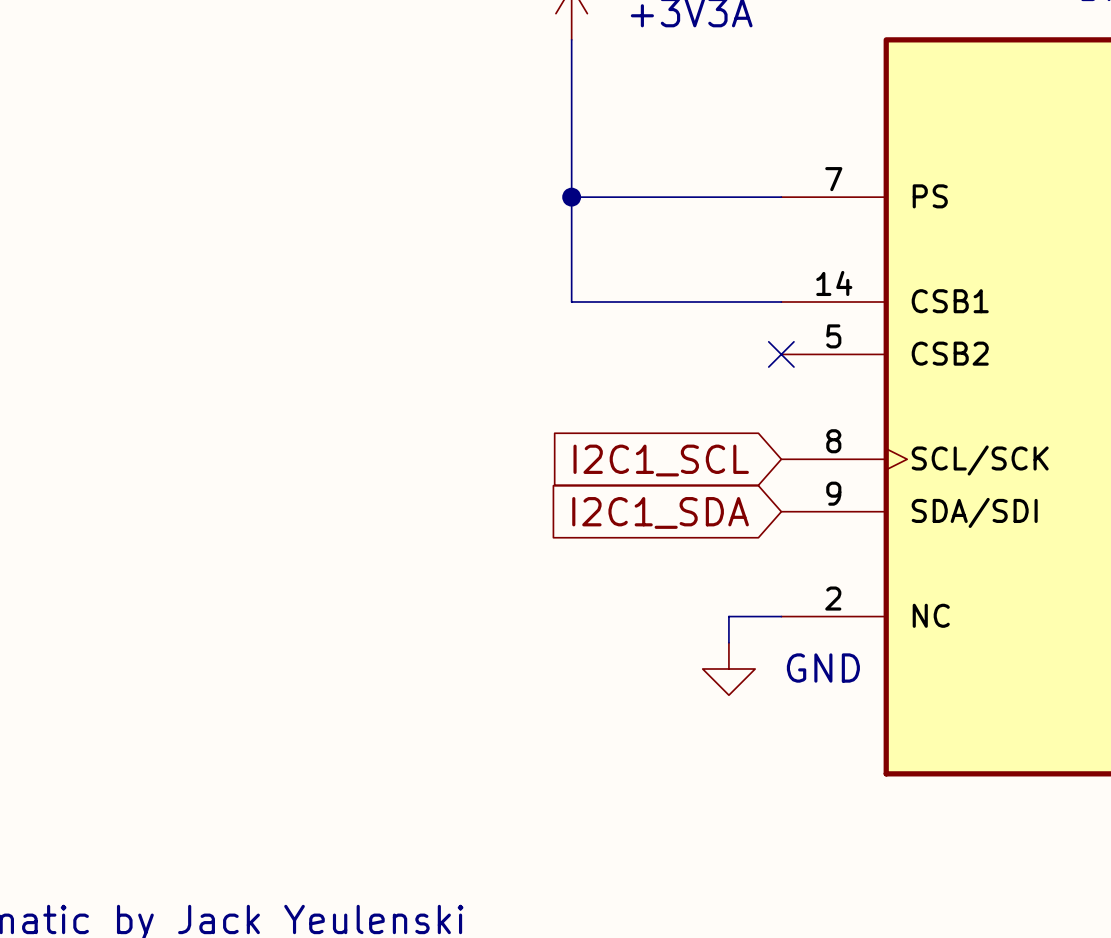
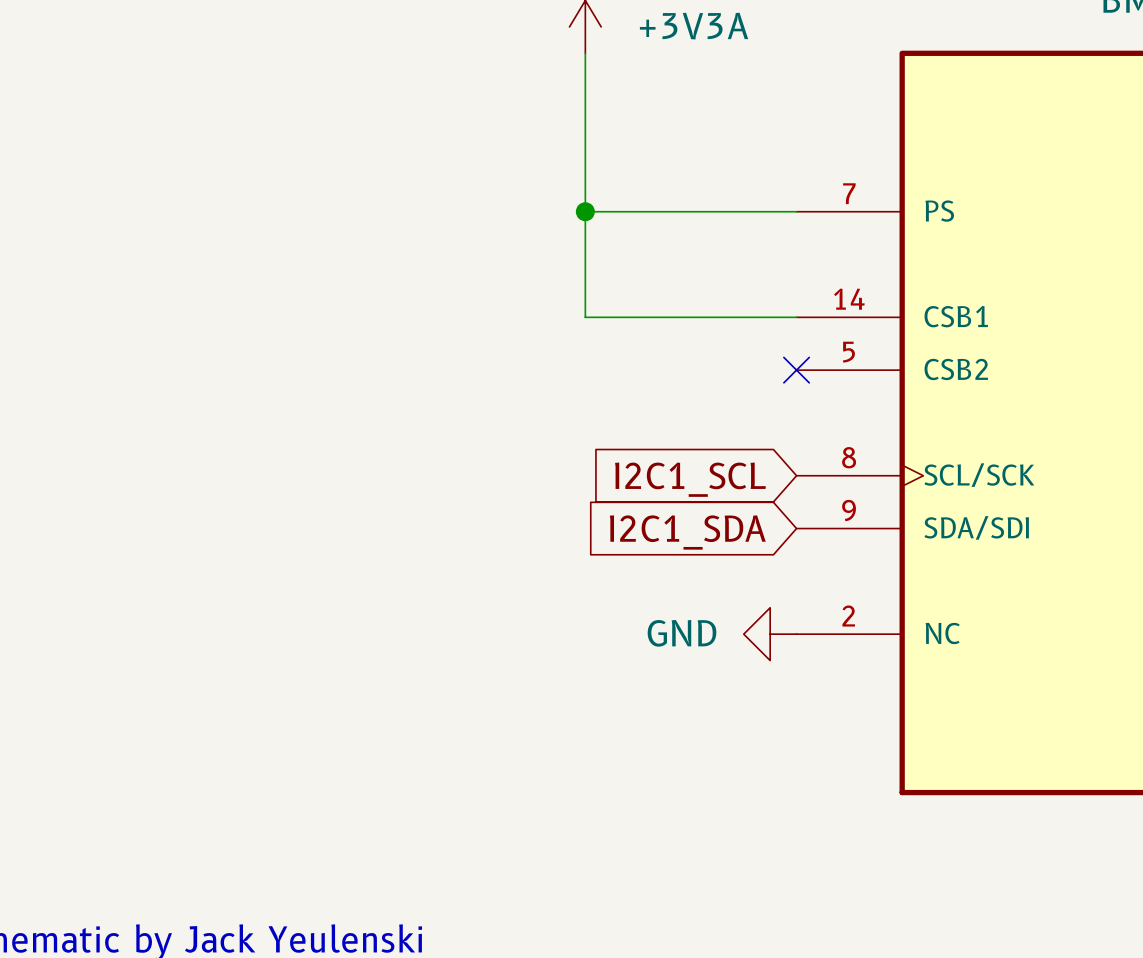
wire: (781, 616) (728, 616) (728, 642) -> none
power symbol rotation: 0° (728, 668) -> 90° clockwise (770, 634)
power symbol position: GND (728, 668) -> GND (770, 634)
power symbol text position: GND (823, 668) -> GND (682, 633)

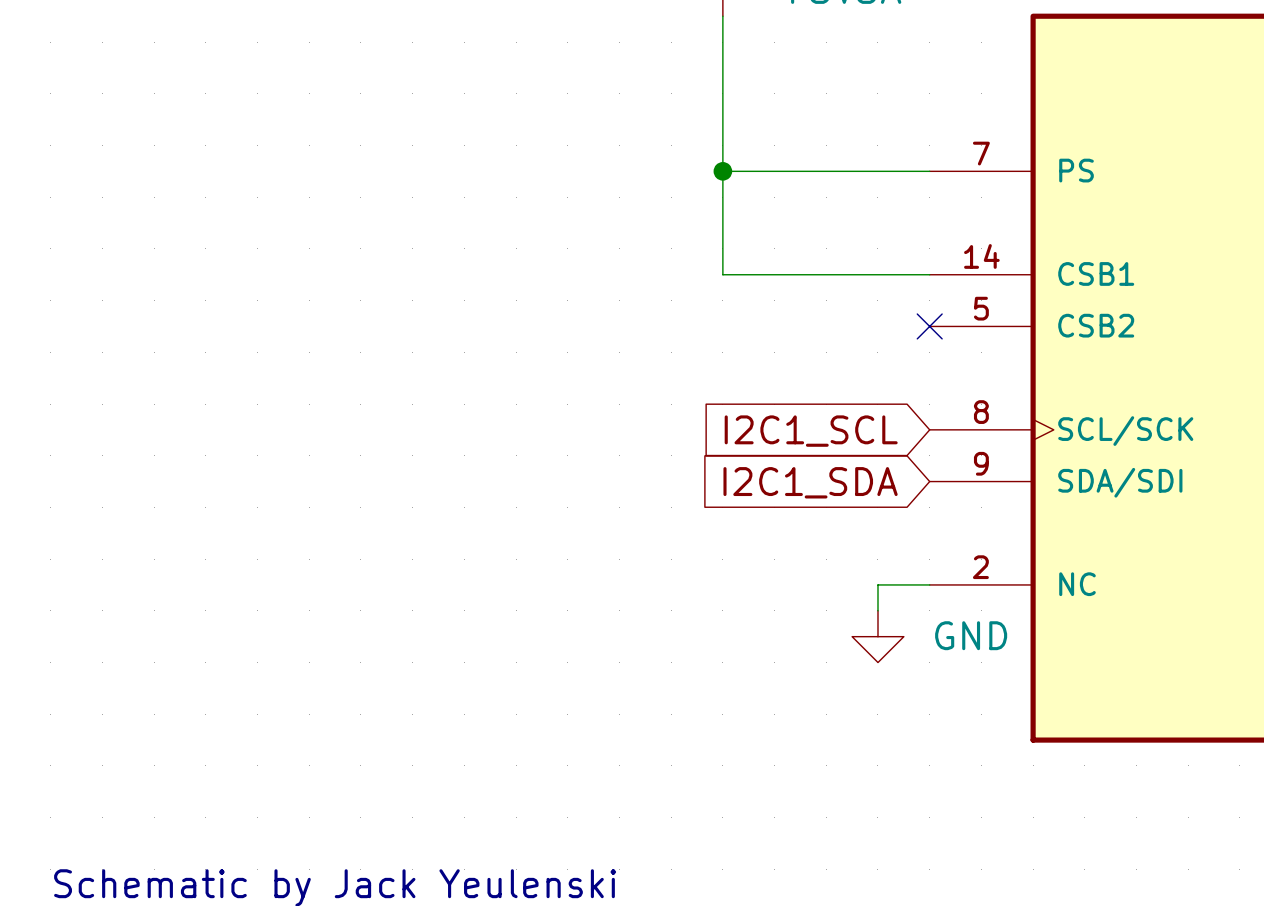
power symbol text position: GND (682, 633) -> GND (971, 635)
power symbol rotation: 0° (770, 634) -> 90° counterclockwise (877, 636)
power symbol position: GND (770, 634) -> GND (877, 636)
wire: none -> (929, 584) (877, 584) (877, 610)

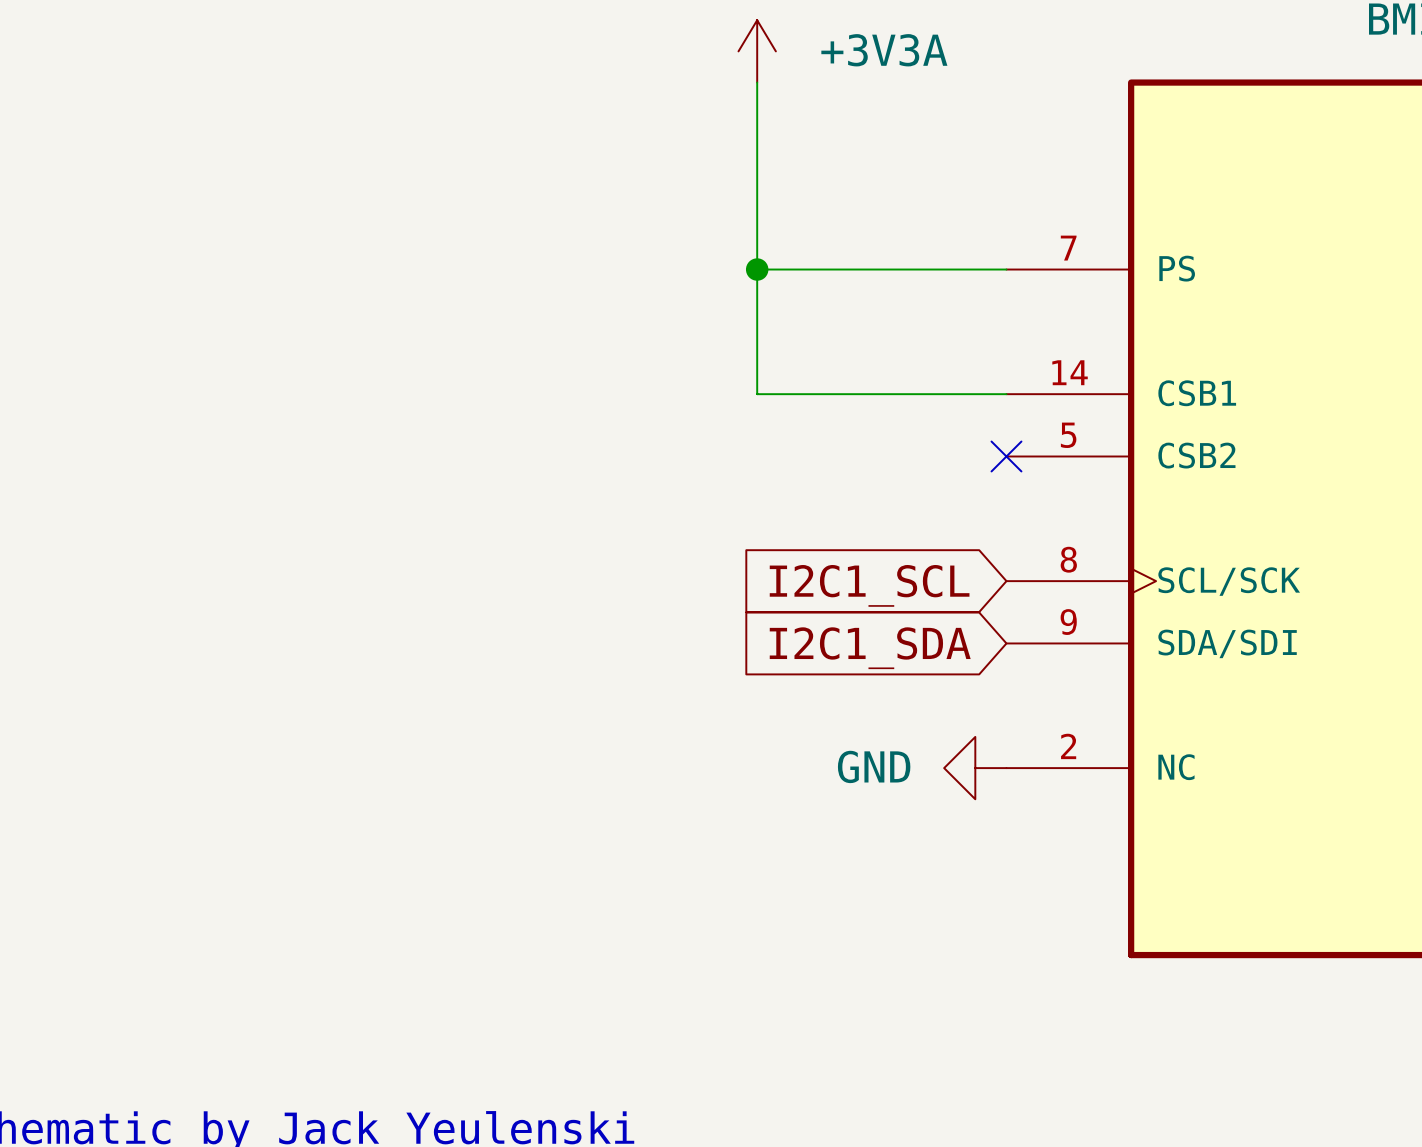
wire: (929, 584) (877, 584) (877, 610) -> none
power symbol text position: GND (971, 635) -> GND (874, 766)
power symbol rotation: 0° (877, 636) -> 90° clockwise (975, 768)
power symbol position: GND (877, 636) -> GND (975, 768)

